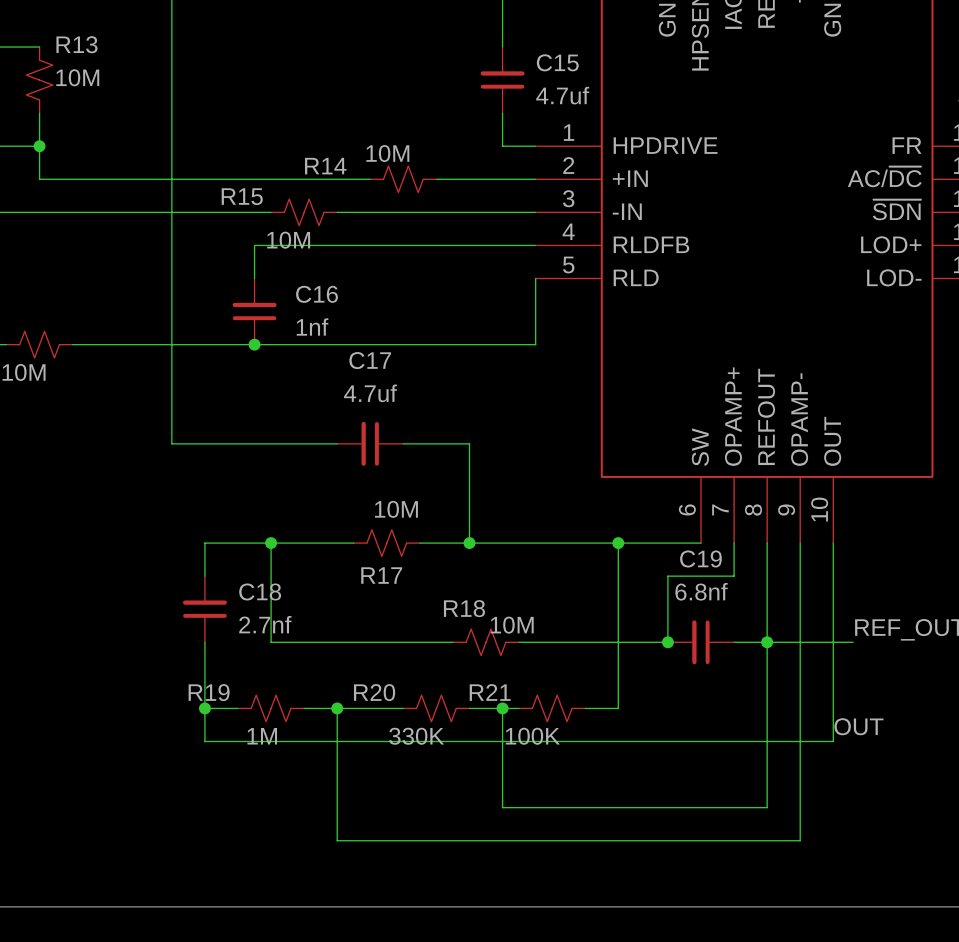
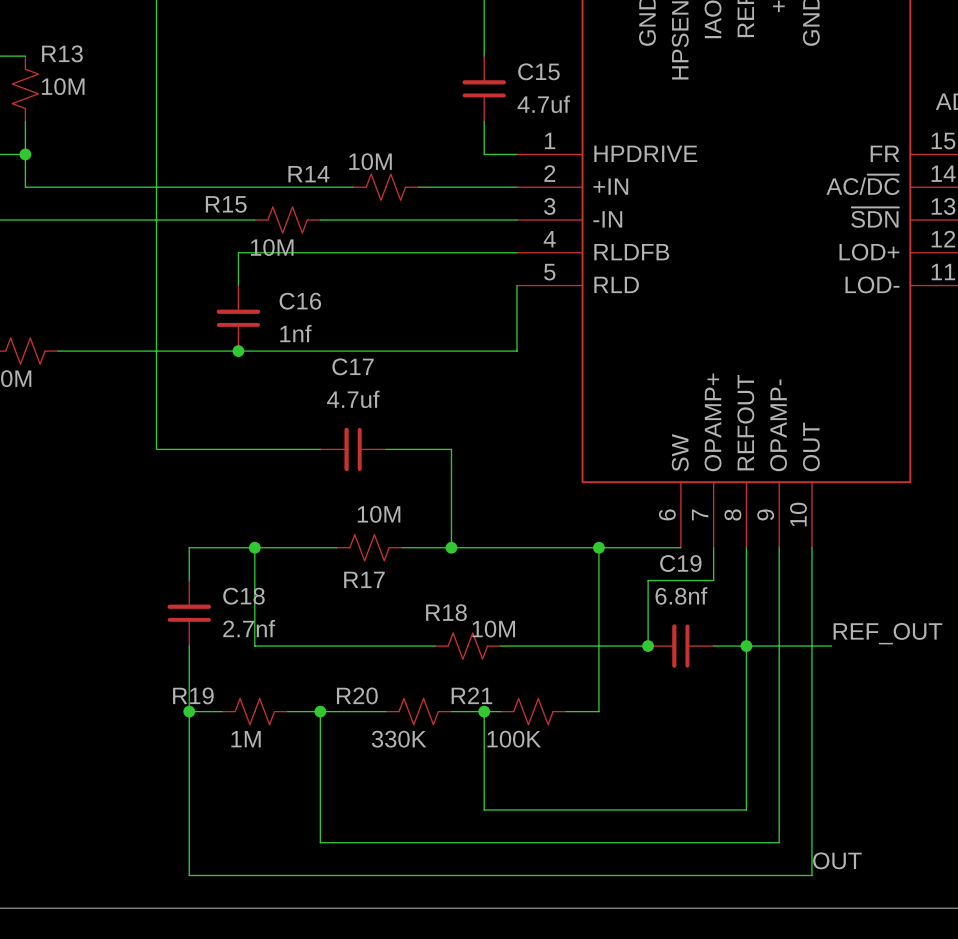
label position: OUT (858, 726) -> OUT (837, 860)
wire: (204, 741) (833, 741) -> (189, 744) (189, 875) (811, 875) (811, 744)

